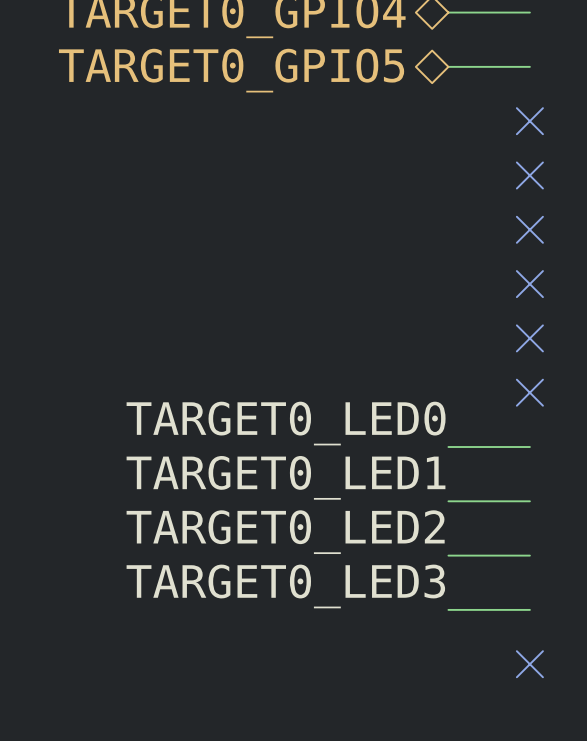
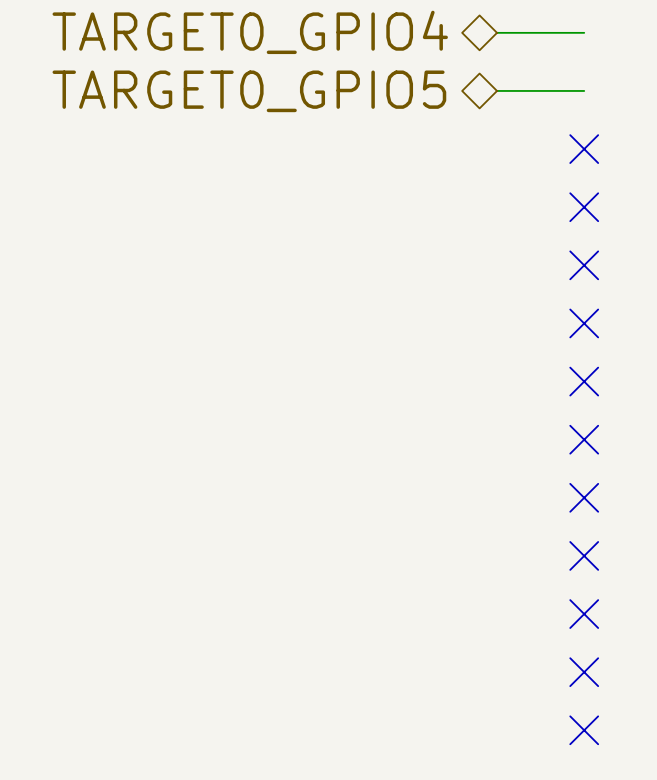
label: TARGET0_LED0 (286, 423) -> none
wire: (448, 447) (529, 447) -> none
no-connect mark: none -> (584, 497)
label: TARGET0_LED1 (286, 477) -> none
wire: (448, 501) (529, 501) -> none
no-connect mark: none -> (584, 555)
label: TARGET0_LED2 (285, 532) -> none
wire: (448, 555) (529, 555) -> none
no-connect mark: none -> (584, 614)
label: TARGET0_LED3 (285, 586) -> none
wire: (448, 609) (529, 609) -> none
no-connect mark: none -> (584, 672)

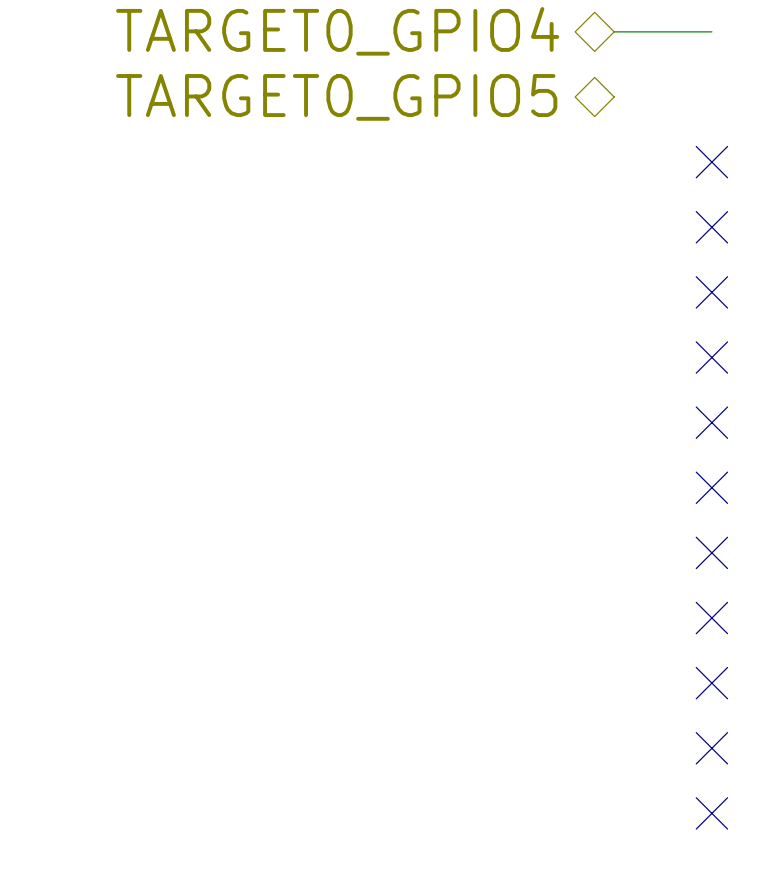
wire: (497, 90) (584, 90) -> none

